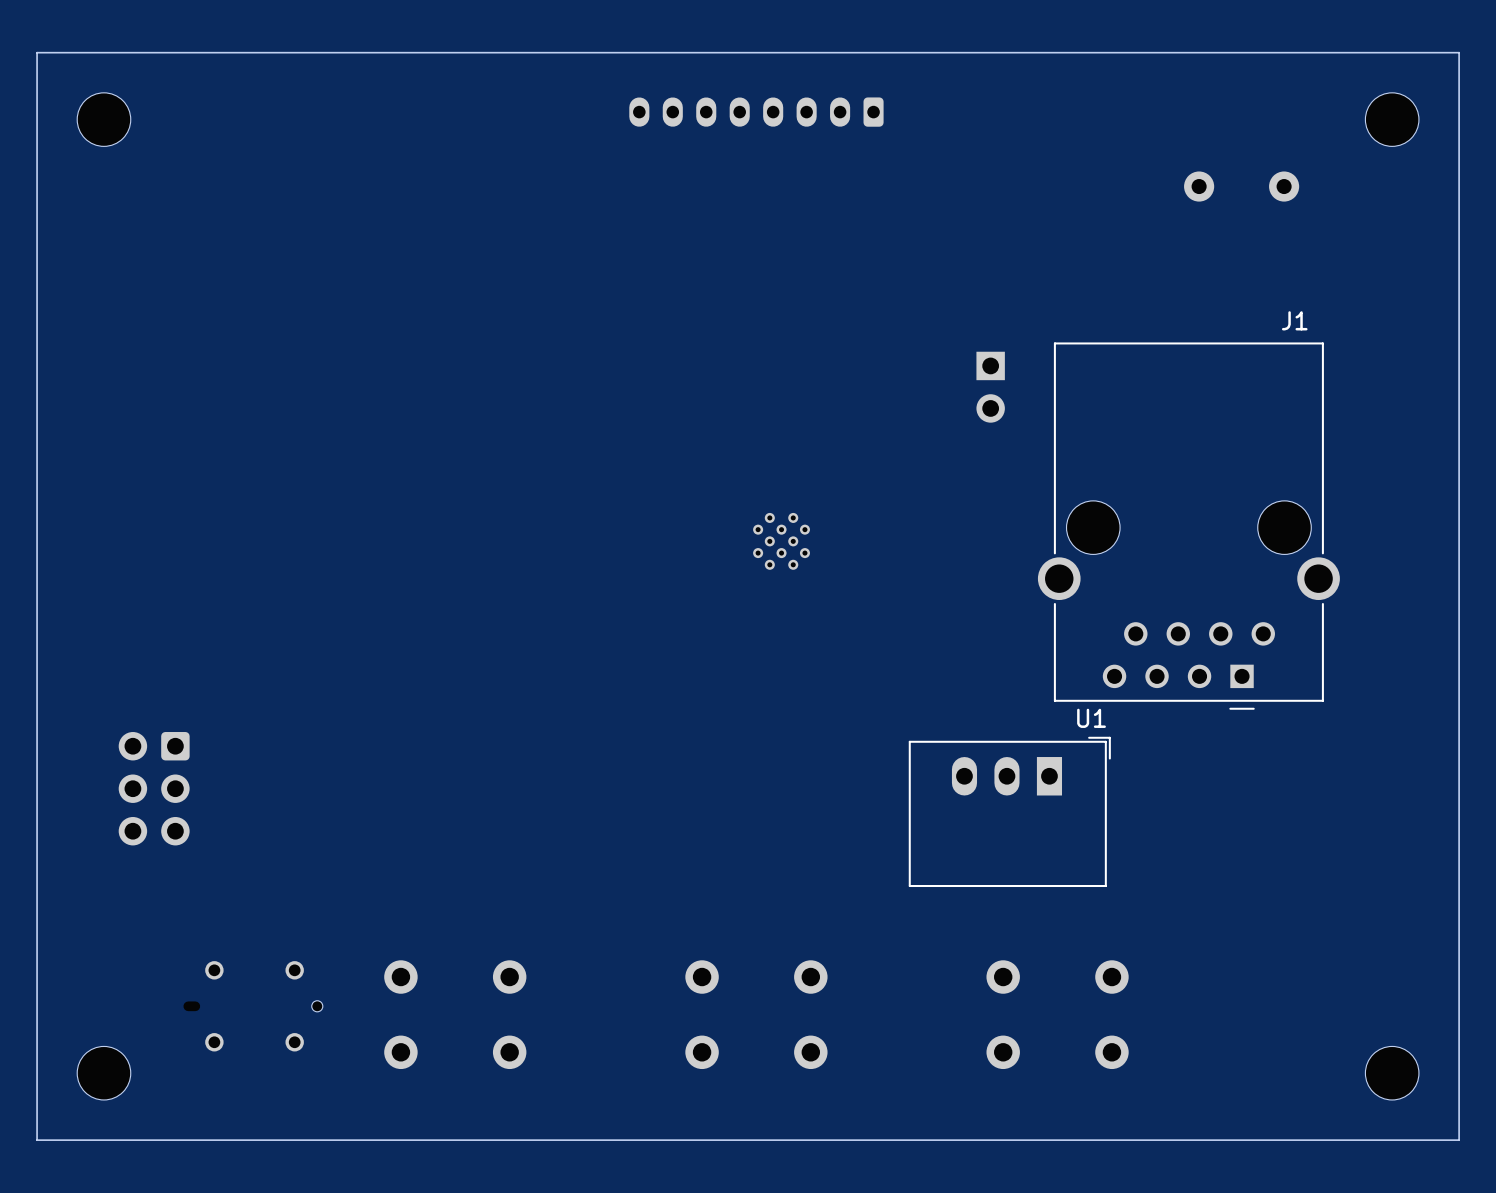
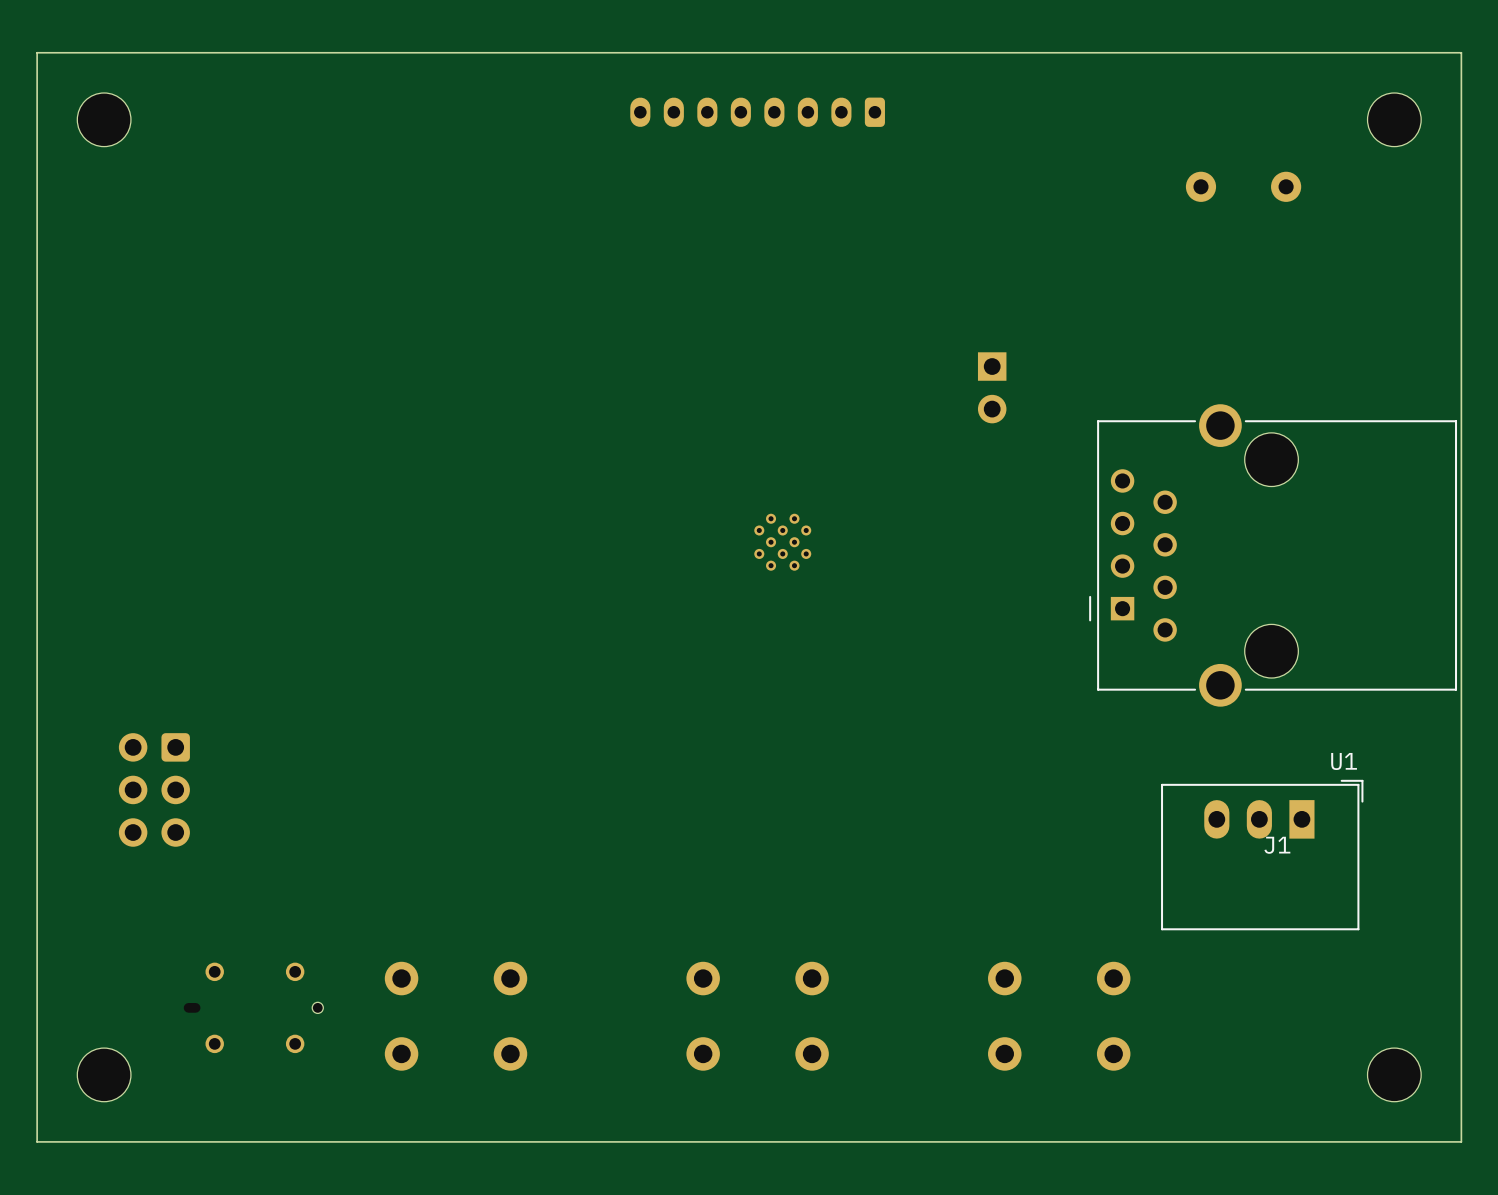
J1 name position: J1 (1294, 320) -> J1 (1277, 845)
J1 rotation: 0° (1188, 526) -> 90° clockwise (1273, 555)
U1 position: (1009, 811) -> (1262, 855)

